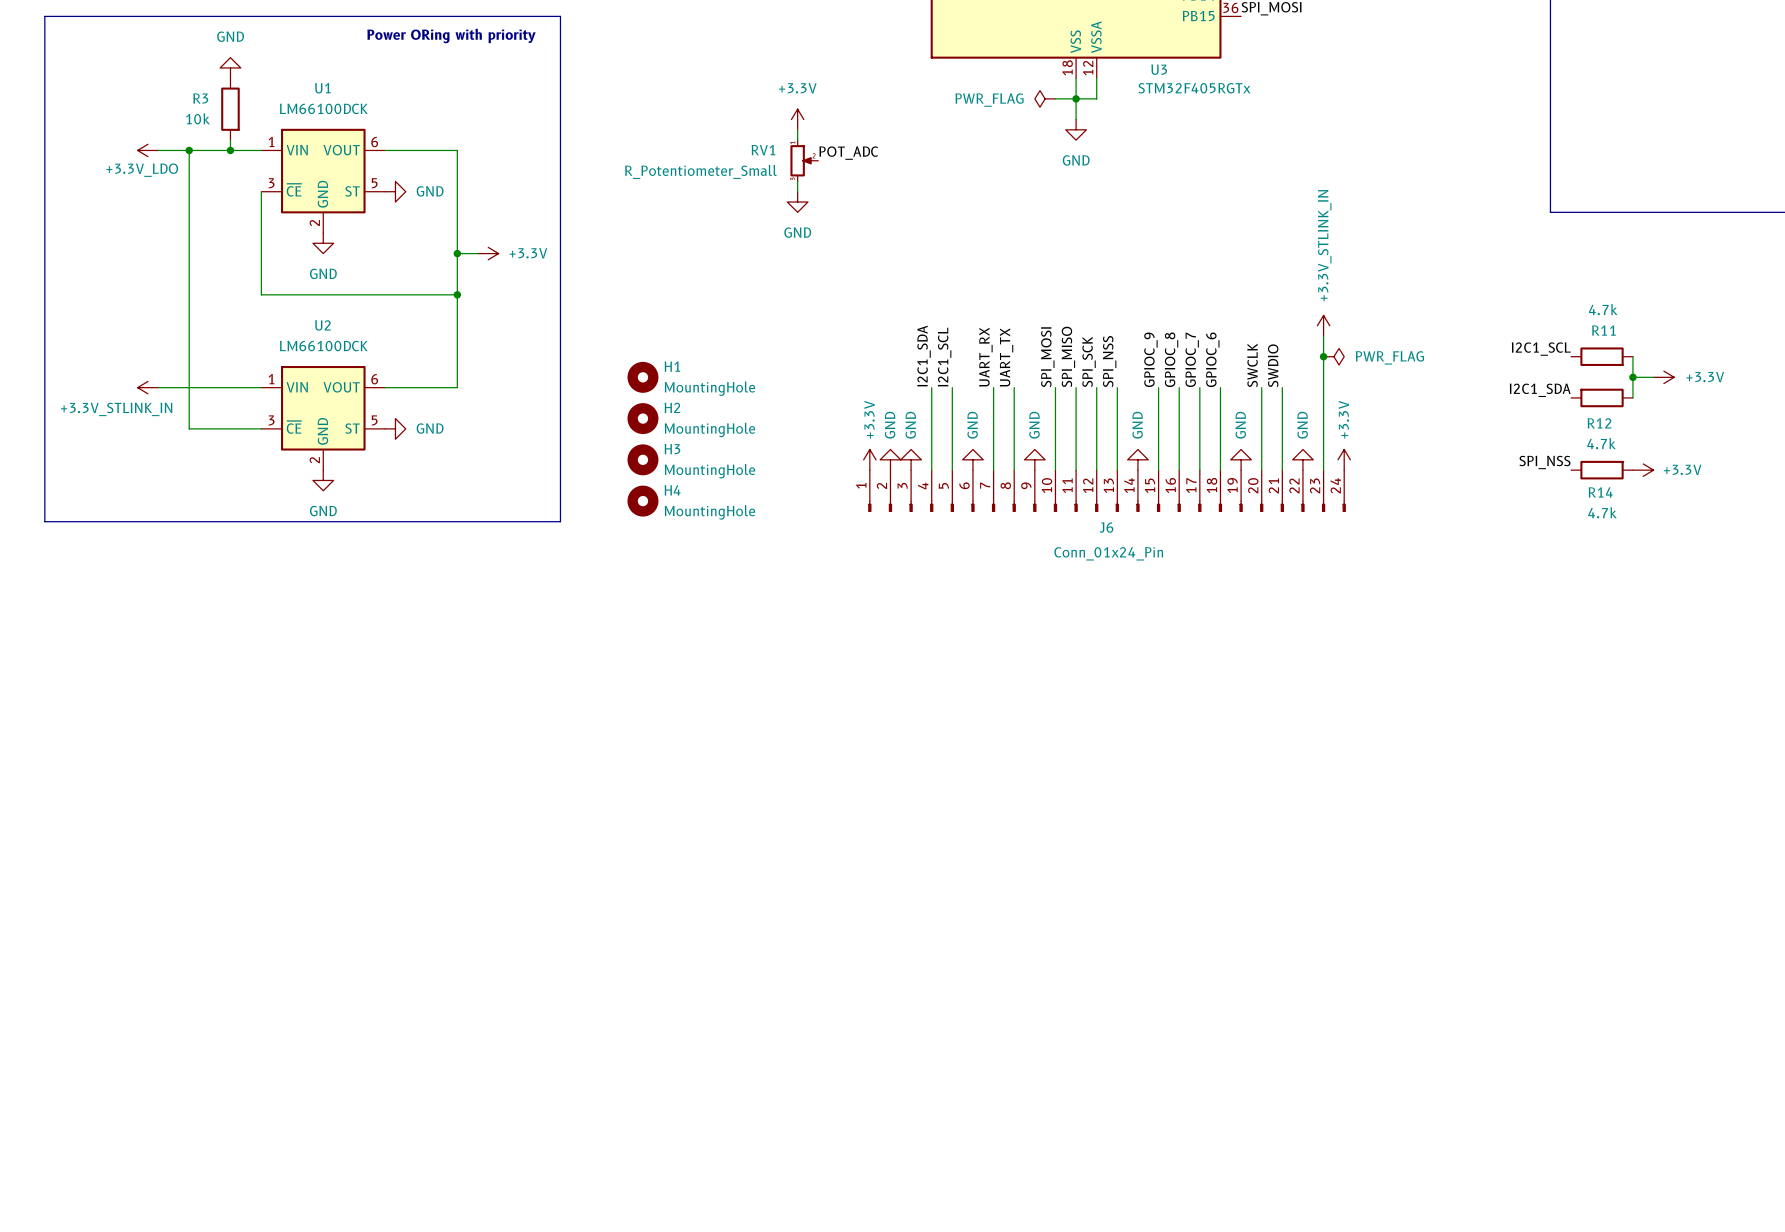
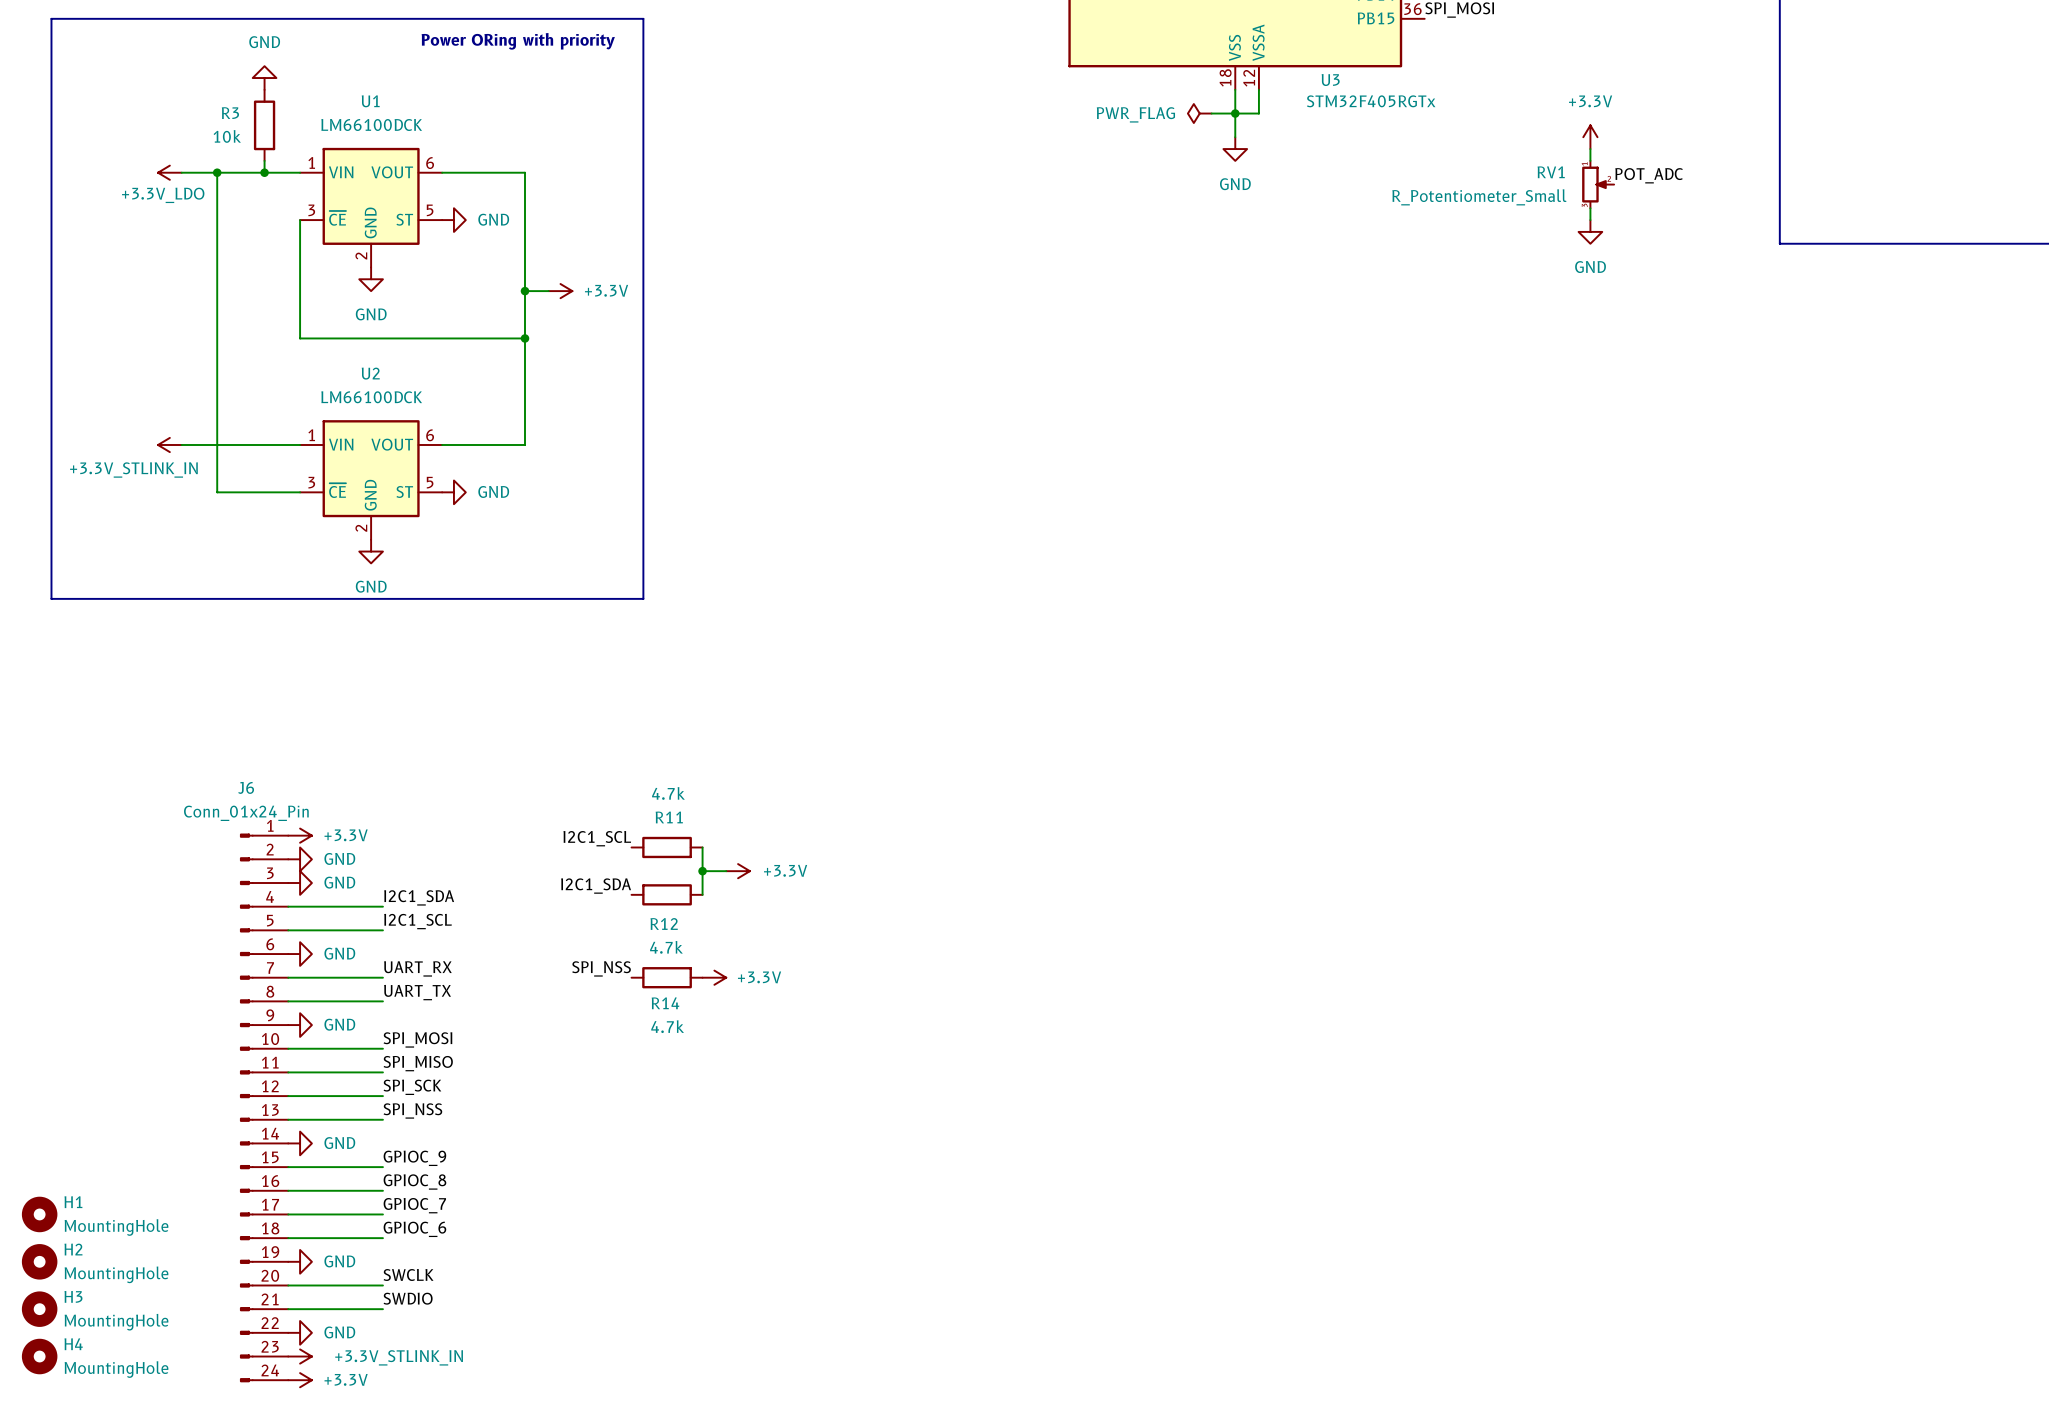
power symbol: +3.3V (797, 119) -> none
power symbol: none -> +3.3V (1590, 137)
wire: (797, 129) (797, 140) -> none
wire: none -> (1590, 149) (1590, 160)
label: POT_ADC (848, 153) -> none
label: none -> POT_ADC (1649, 175)
RV1 position: (804, 160) -> (1598, 184)
wire: (797, 181) (797, 191) -> none
wire: none -> (1590, 208) (1590, 220)
power symbol: GND (797, 202) -> none
power symbol: none -> GND (1590, 231)
power symbol: +3.3V_STLINK_IN (1323, 325) -> none
wire: (1323, 336) (1323, 470) -> none
label: I2C1_SCL (1541, 349) -> none
label: I2C1_SDA (924, 356) -> none
label: SPI_MISO (1068, 356) -> none
junction: (1323, 356) -> none
power symbol: PWR_FLAG (1333, 356) -> none
R11 position: (1602, 356) -> (667, 847)
wire: (1632, 356) (1632, 397) -> none
label: I2C1_SCL (944, 357) -> none
label: UART_RX (985, 357) -> none
label: UART_TX (1006, 357) -> none
label: SPI_MOSI (1047, 357) -> none
label: GPIOC_9 (1150, 359) -> none
label: GPIOC_8 (1171, 359) -> none
label: GPIOC_7 (1192, 359) -> none
label: GPIOC_6 (1212, 359) -> none
label: SPI_SCK (1089, 361) -> none
label: SPI_NSS (1109, 361) -> none
label: SWCLK (1252, 365) -> none
label: SWDIO (1273, 365) -> none
H1 position: (642, 377) -> (39, 1214)
wire: (1632, 377) (1653, 377) -> none
junction: (1632, 377) -> none
power symbol: +3.3V (1663, 377) -> none
wire: (931, 387) (931, 470) -> none
wire: (952, 387) (952, 470) -> none
wire: (993, 387) (993, 470) -> none
wire: (1014, 387) (1014, 470) -> none
wire: (1055, 387) (1055, 470) -> none
wire: (1076, 387) (1076, 470) -> none
wire: (1096, 387) (1096, 470) -> none
wire: (1117, 387) (1117, 470) -> none
wire: (1158, 387) (1158, 470) -> none
wire: (1179, 387) (1179, 470) -> none
wire: (1199, 387) (1199, 470) -> none
wire: (1220, 387) (1220, 470) -> none
wire: (1261, 387) (1261, 470) -> none
wire: (1282, 387) (1282, 470) -> none
label: I2C1_SDA (1540, 390) -> none
R12 position: (1602, 397) -> (667, 894)
H2 position: (642, 418) -> (39, 1261)
H3 position: (642, 459) -> (39, 1309)
power symbol: +3.3V (869, 459) -> none
power symbol: GND (890, 459) -> none
power symbol: GND (911, 459) -> none
power symbol: GND (972, 459) -> none
power symbol: GND (1034, 459) -> none
power symbol: GND (1137, 459) -> none
power symbol: GND (1241, 459) -> none
power symbol: GND (1302, 459) -> none
power symbol: +3.3V (1344, 459) -> none
label: SPI_NSS (1544, 462) -> none
R14 position: (1602, 470) -> (667, 977)
power symbol: +3.3V (1643, 470) -> none
J6 position: (1107, 491) -> (264, 1107)
H4 position: (642, 501) -> (39, 1356)
J6 rotation: 0° (1107, 506) -> 90° clockwise (246, 1107)
J6 name position: J6 (1106, 527) -> J6 (246, 787)
J6 value position: Conn_01x24_Pin (1108, 553) -> Conn_01x24_Pin (246, 813)
power symbol: none -> +3.3V (300, 835)
label: none -> I2C1_SCL (597, 838)
wire: none -> (702, 847) (702, 894)
power symbol: none -> GND (300, 859)
wire: none -> (702, 871) (726, 871)
junction: none -> (702, 871)
power symbol: none -> +3.3V (738, 871)
power symbol: none -> GND (300, 883)
label: none -> I2C1_SDA (596, 886)
label: none -> I2C1_SDA (419, 897)
wire: none -> (288, 906) (382, 906)
label: none -> I2C1_SCL (417, 921)
wire: none -> (288, 930) (382, 930)
power symbol: none -> GND (300, 954)
label: none -> UART_RX (417, 968)
label: none -> SPI_NSS (601, 968)
wire: none -> (288, 977) (382, 977)
power symbol: none -> +3.3V (714, 977)
label: none -> UART_TX (417, 992)
wire: none -> (288, 1001) (382, 1001)
power symbol: none -> GND (300, 1025)
label: none -> SPI_MOSI (417, 1039)
wire: none -> (288, 1048) (382, 1048)
label: none -> SPI_MISO (418, 1063)
wire: none -> (288, 1072) (382, 1072)
label: none -> SPI_SCK (412, 1087)
wire: none -> (288, 1096) (382, 1096)
label: none -> SPI_NSS (412, 1110)
wire: none -> (288, 1119) (382, 1119)
power symbol: none -> GND (300, 1143)
label: none -> GPIOC_9 (414, 1158)
wire: none -> (288, 1167) (382, 1167)
label: none -> GPIOC_8 (414, 1181)
wire: none -> (288, 1190) (382, 1190)
label: none -> GPIOC_7 (414, 1205)
wire: none -> (288, 1214) (382, 1214)
label: none -> GPIOC_6 (414, 1229)
wire: none -> (288, 1238) (382, 1238)
power symbol: none -> GND (300, 1261)
label: none -> SWCLK (408, 1274)
wire: none -> (288, 1285) (382, 1285)
label: none -> SWDIO (408, 1298)
wire: none -> (288, 1309) (382, 1309)
power symbol: none -> GND (300, 1332)
power symbol: none -> +3.3V_STLINK_IN (300, 1356)
power symbol: none -> +3.3V (300, 1380)

